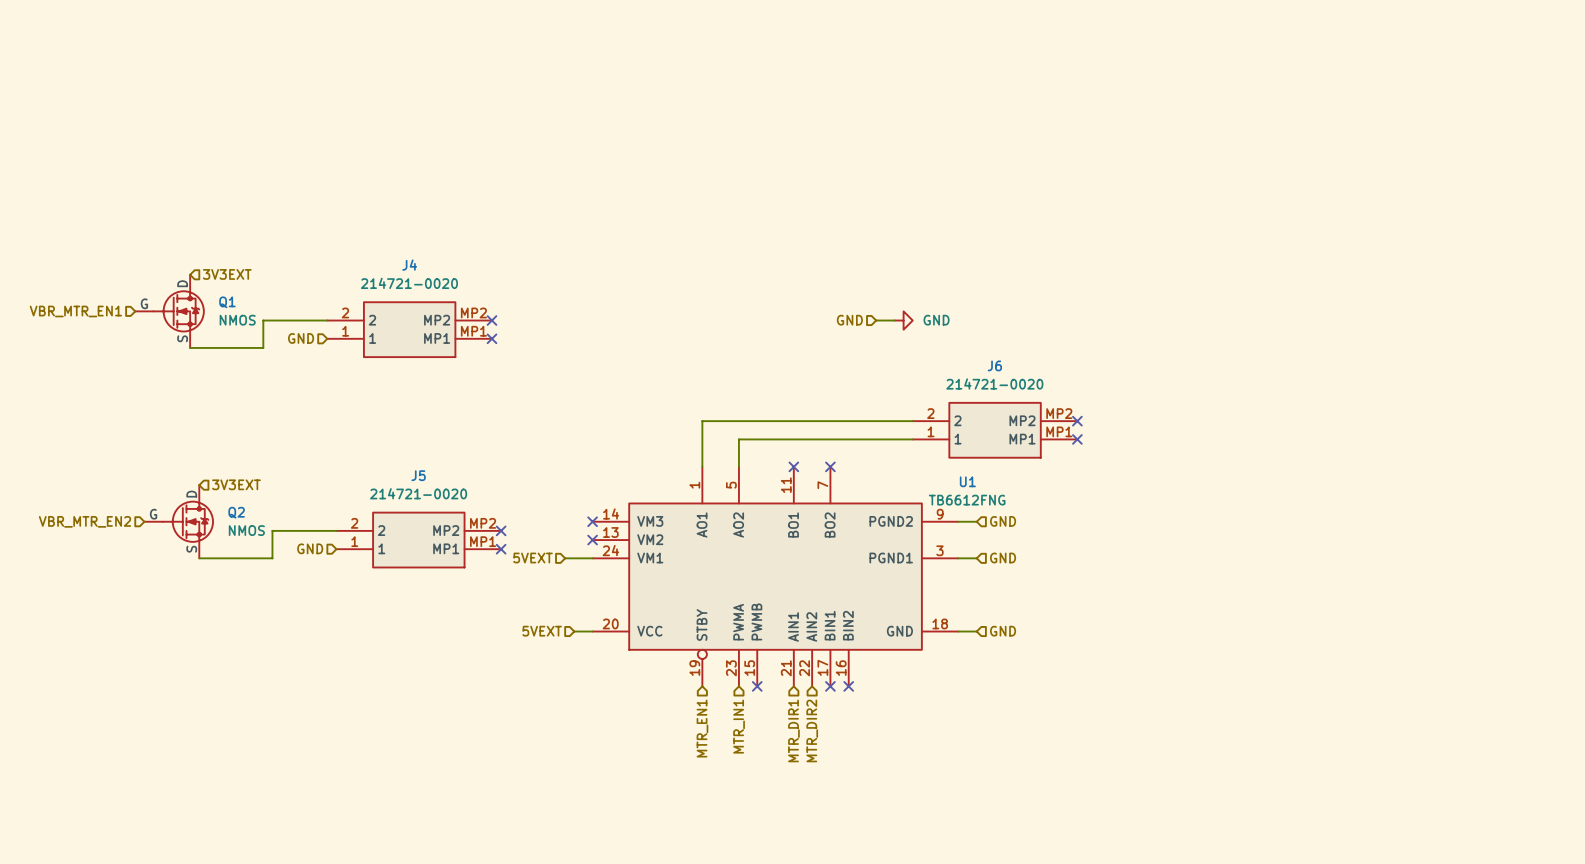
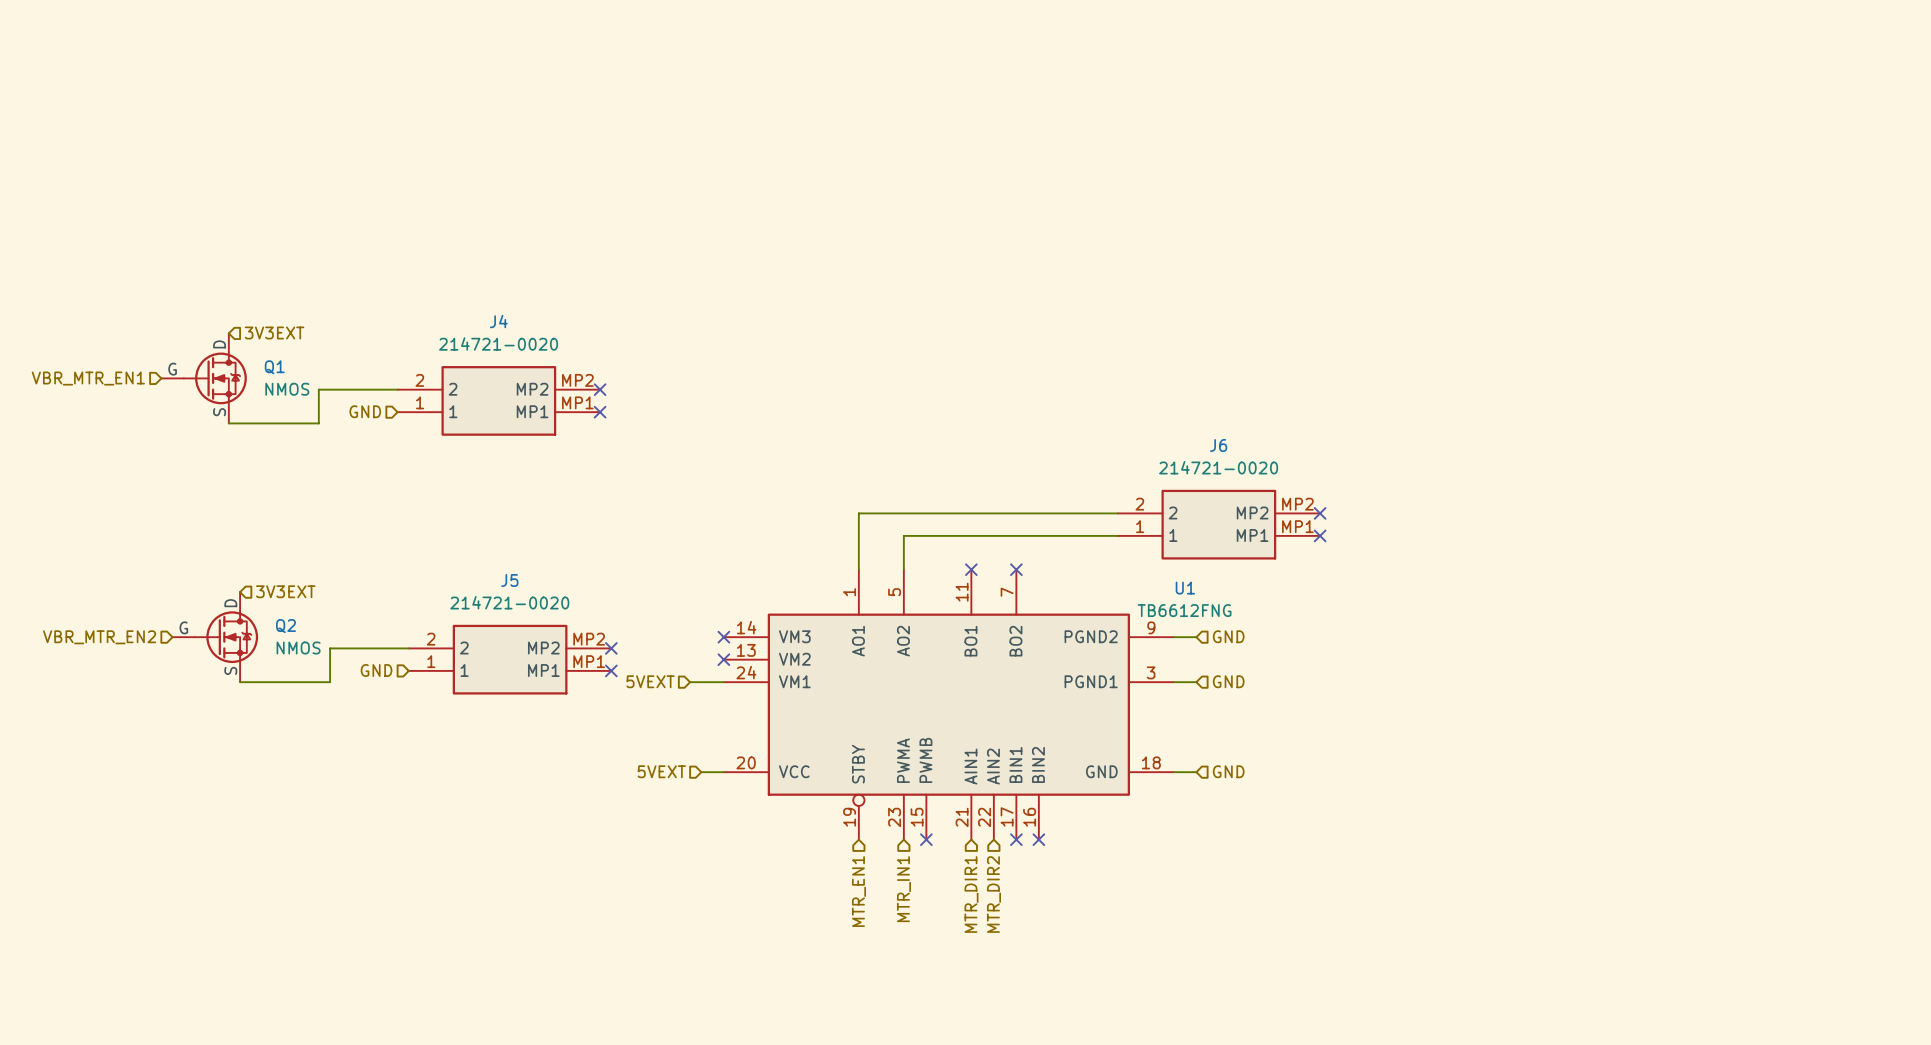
hierarchical label: GND (849, 320) -> none
wire: (876, 320) (894, 320) -> none
power symbol: GND (903, 320) -> none

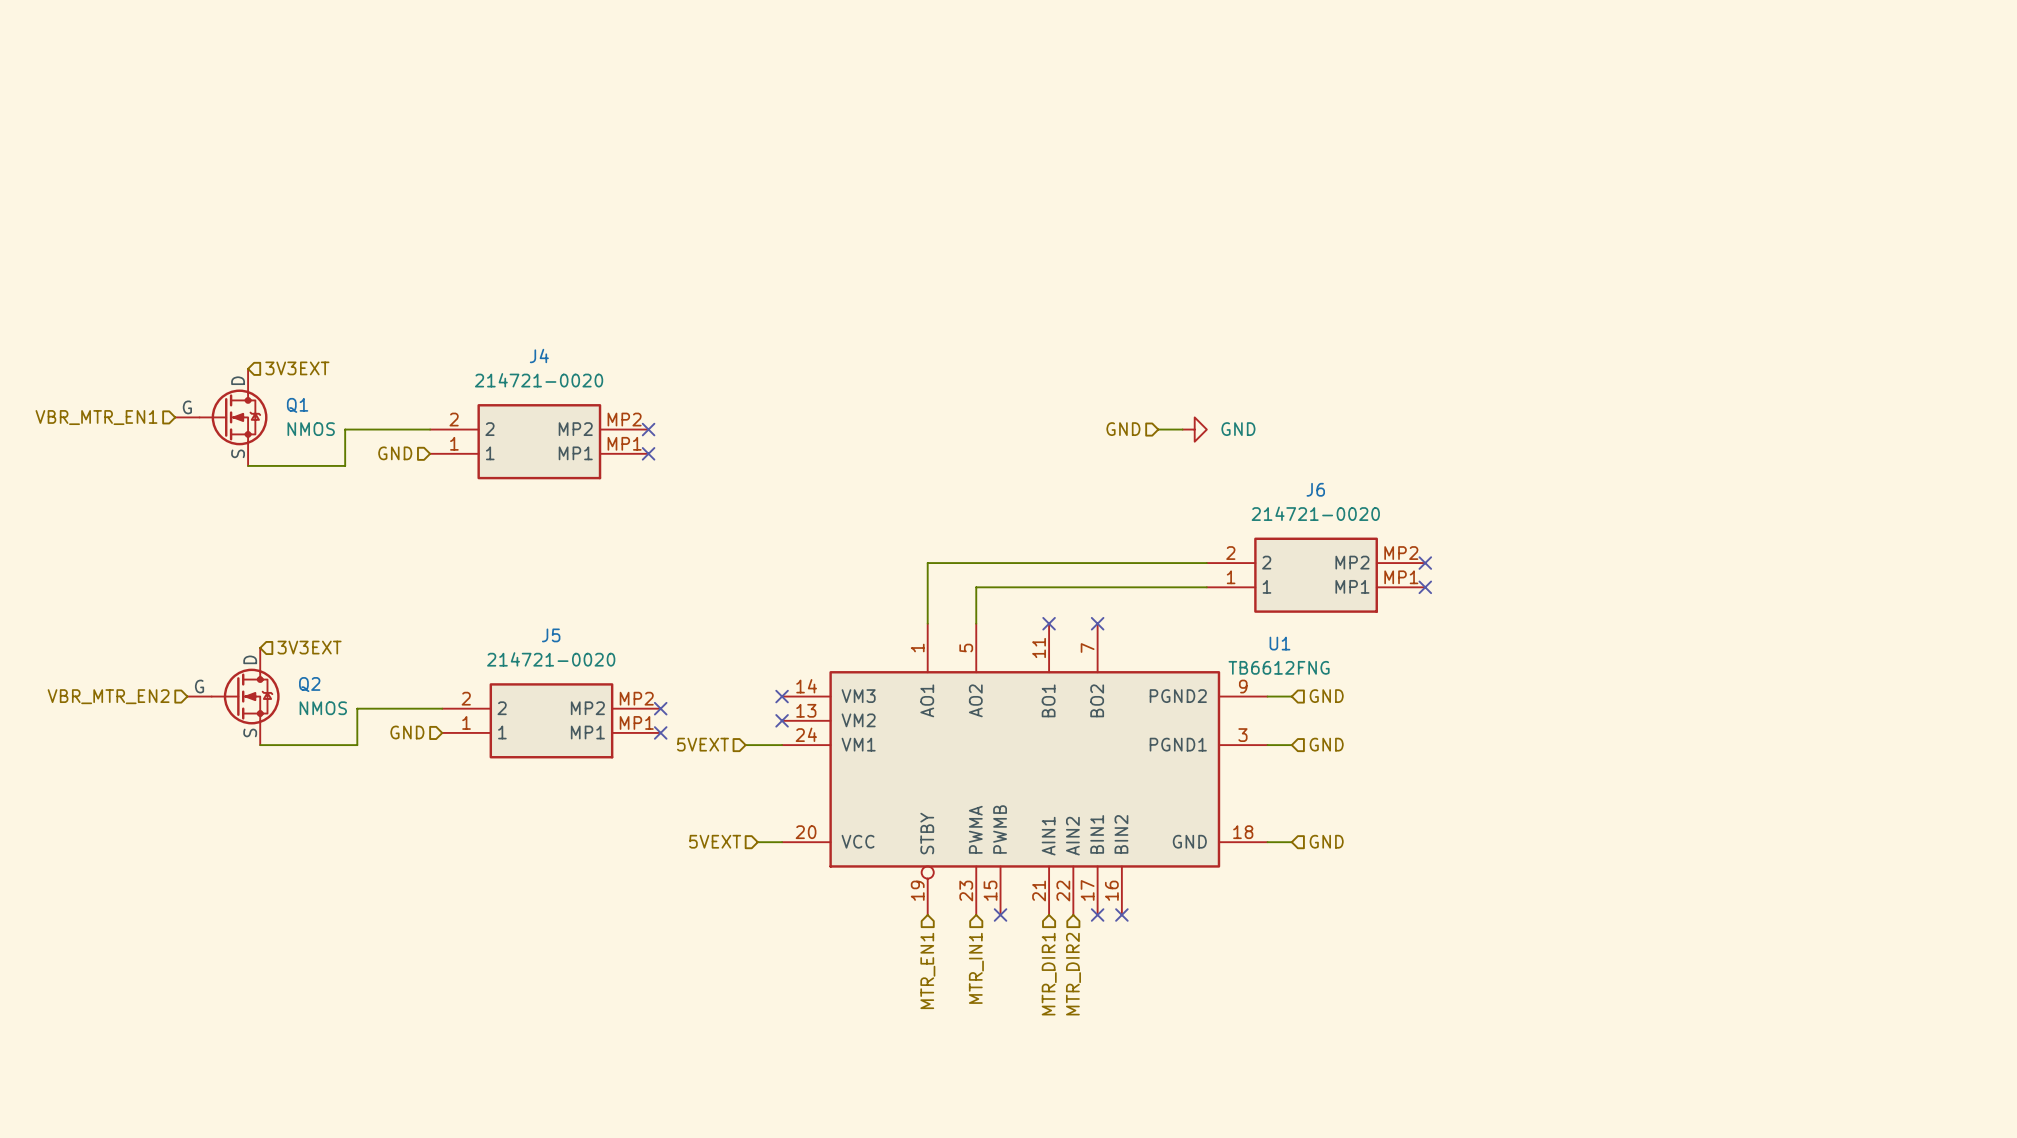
hierarchical label: none -> GND (1123, 429)
wire: none -> (1158, 429) (1182, 429)
power symbol: none -> GND (1194, 429)

